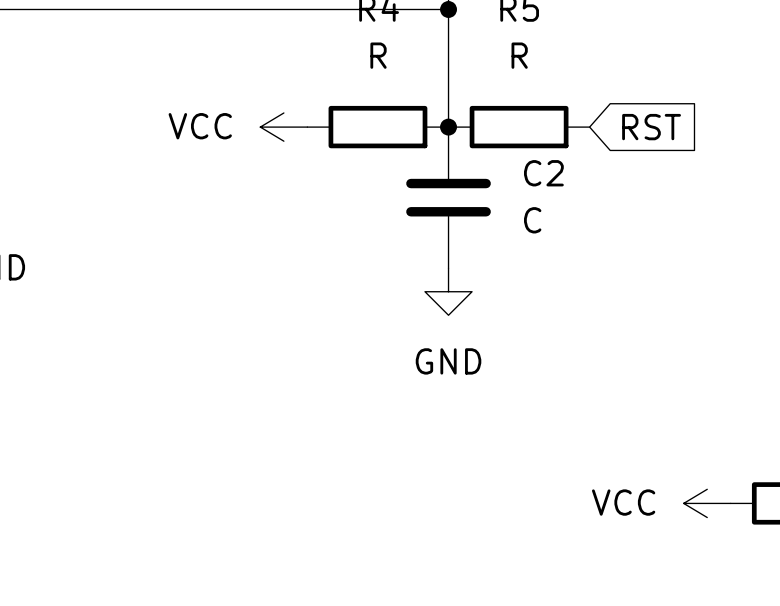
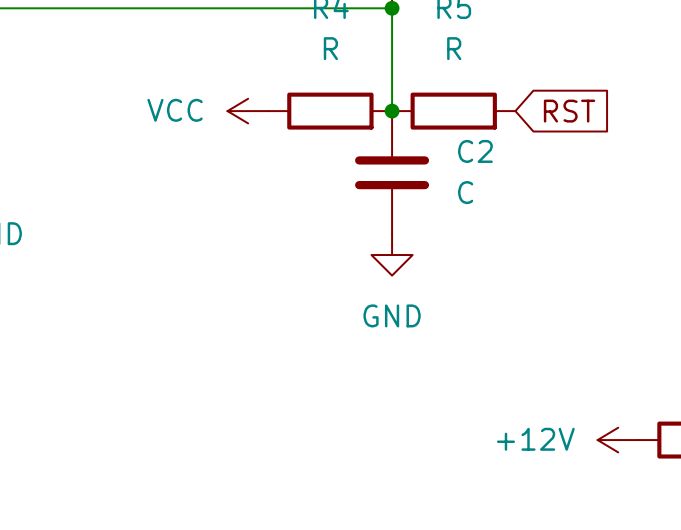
power symbol: VCC (707, 503) -> +12V (618, 440)

